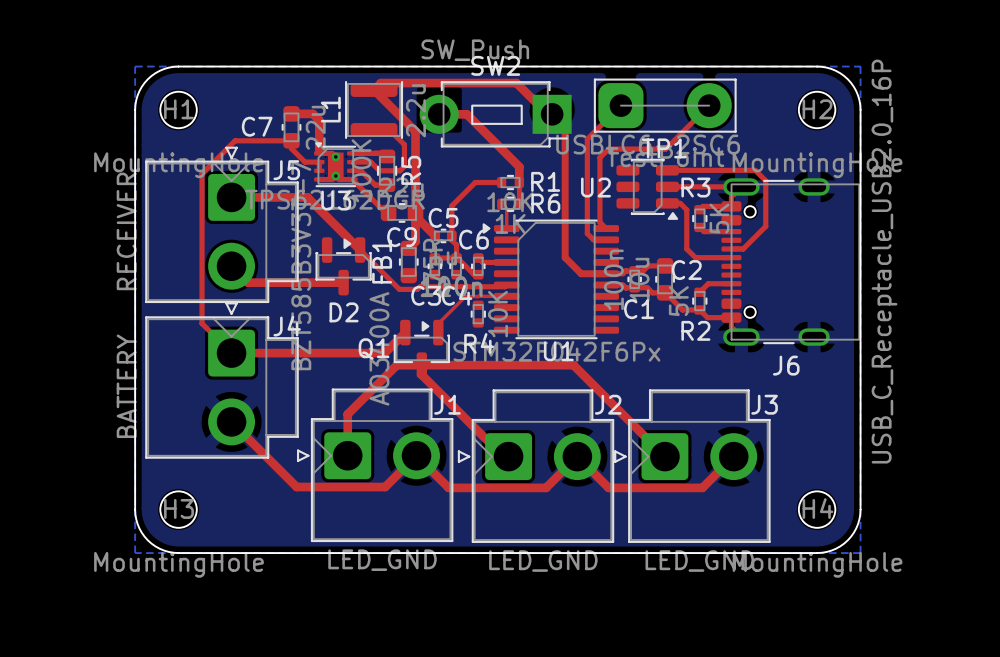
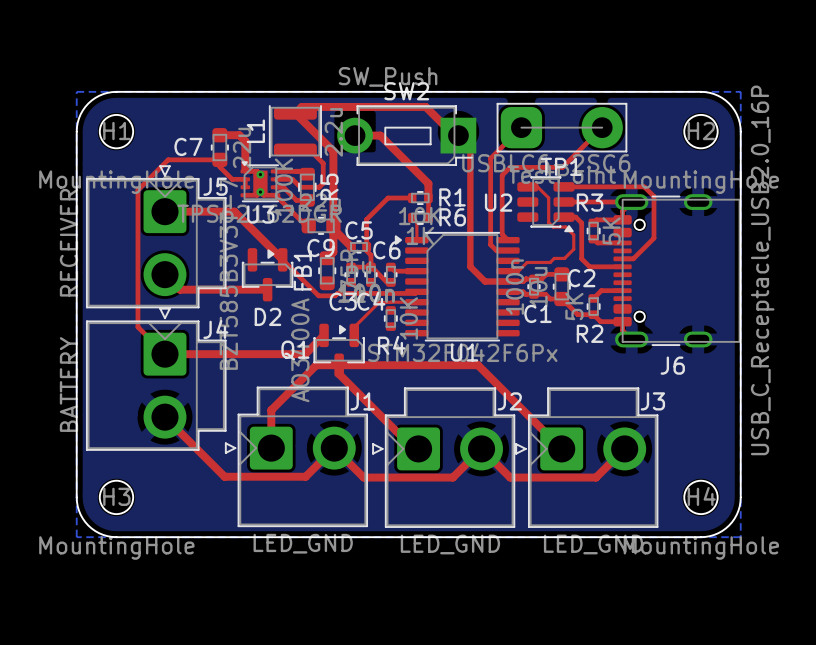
top track: none -> (527, 186) (537, 186) (548, 198) (548, 222) (553, 227) (565, 227) (573, 235) (573, 249) (564, 258) (554, 258) (550, 262) (527, 262) (518, 271) (507, 271)

